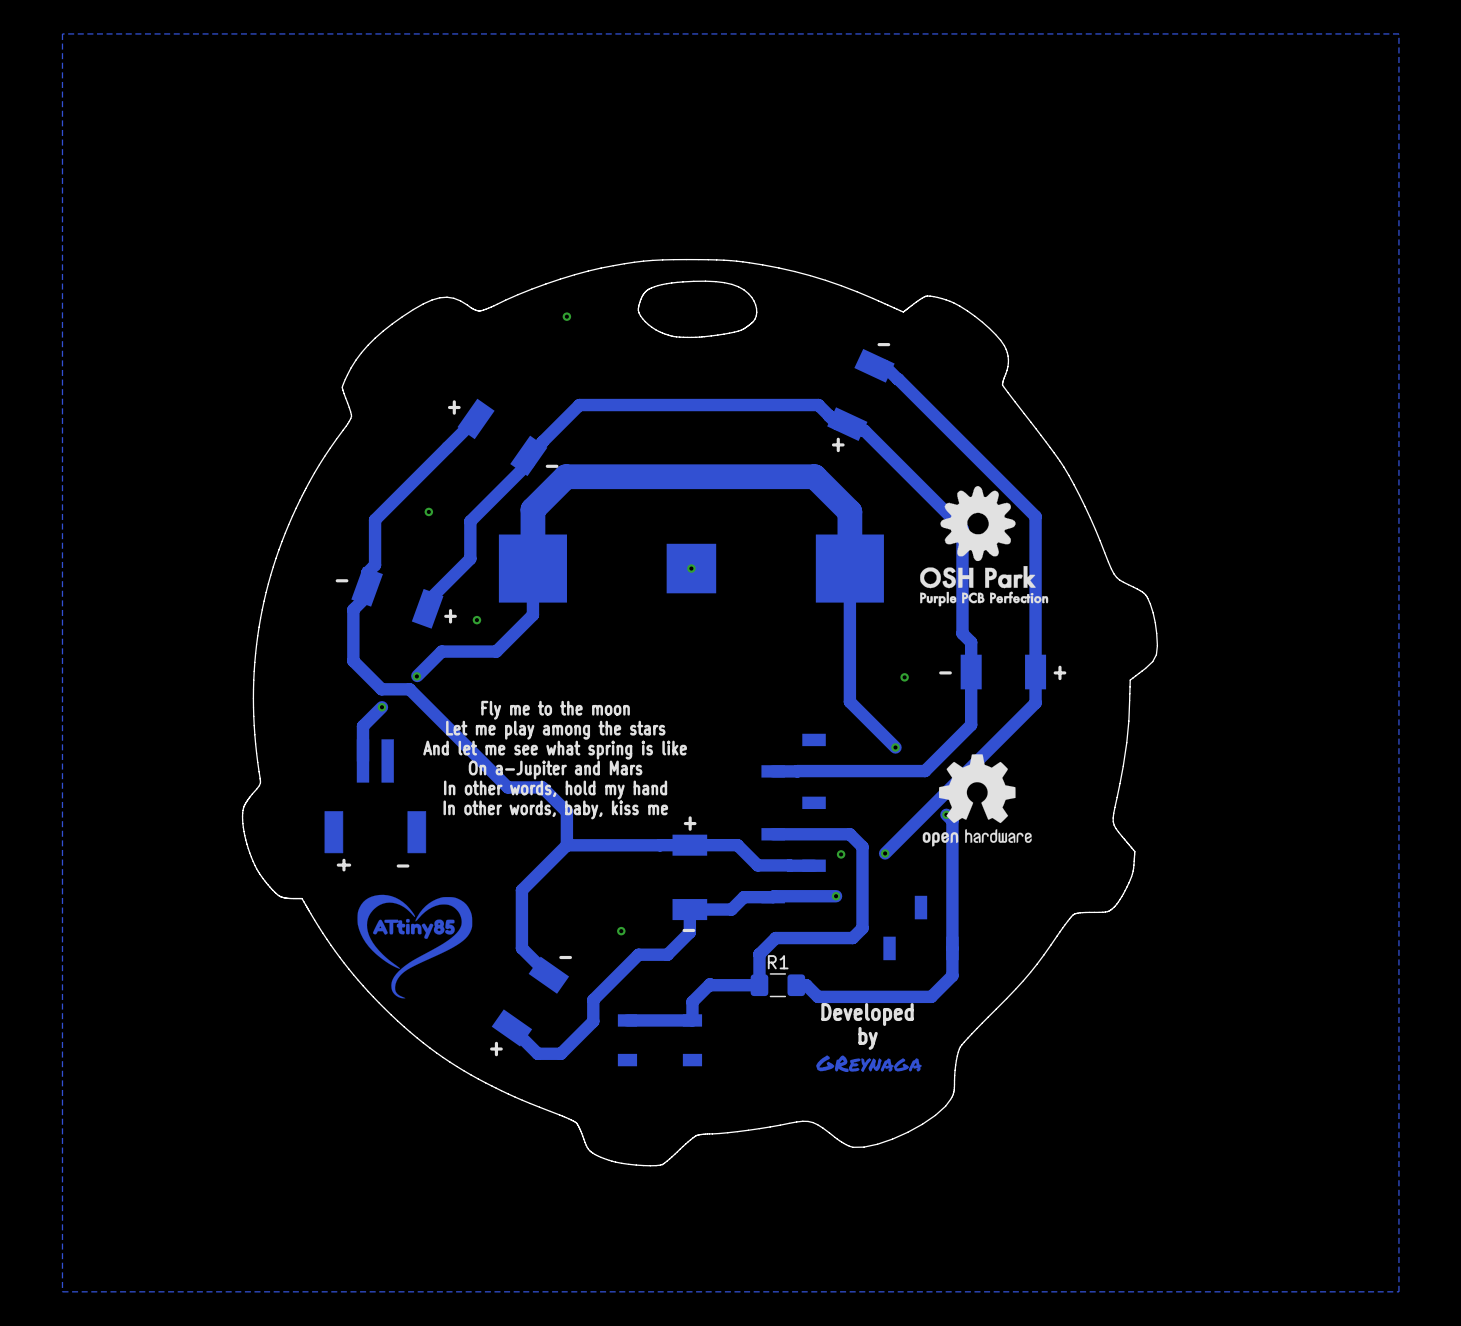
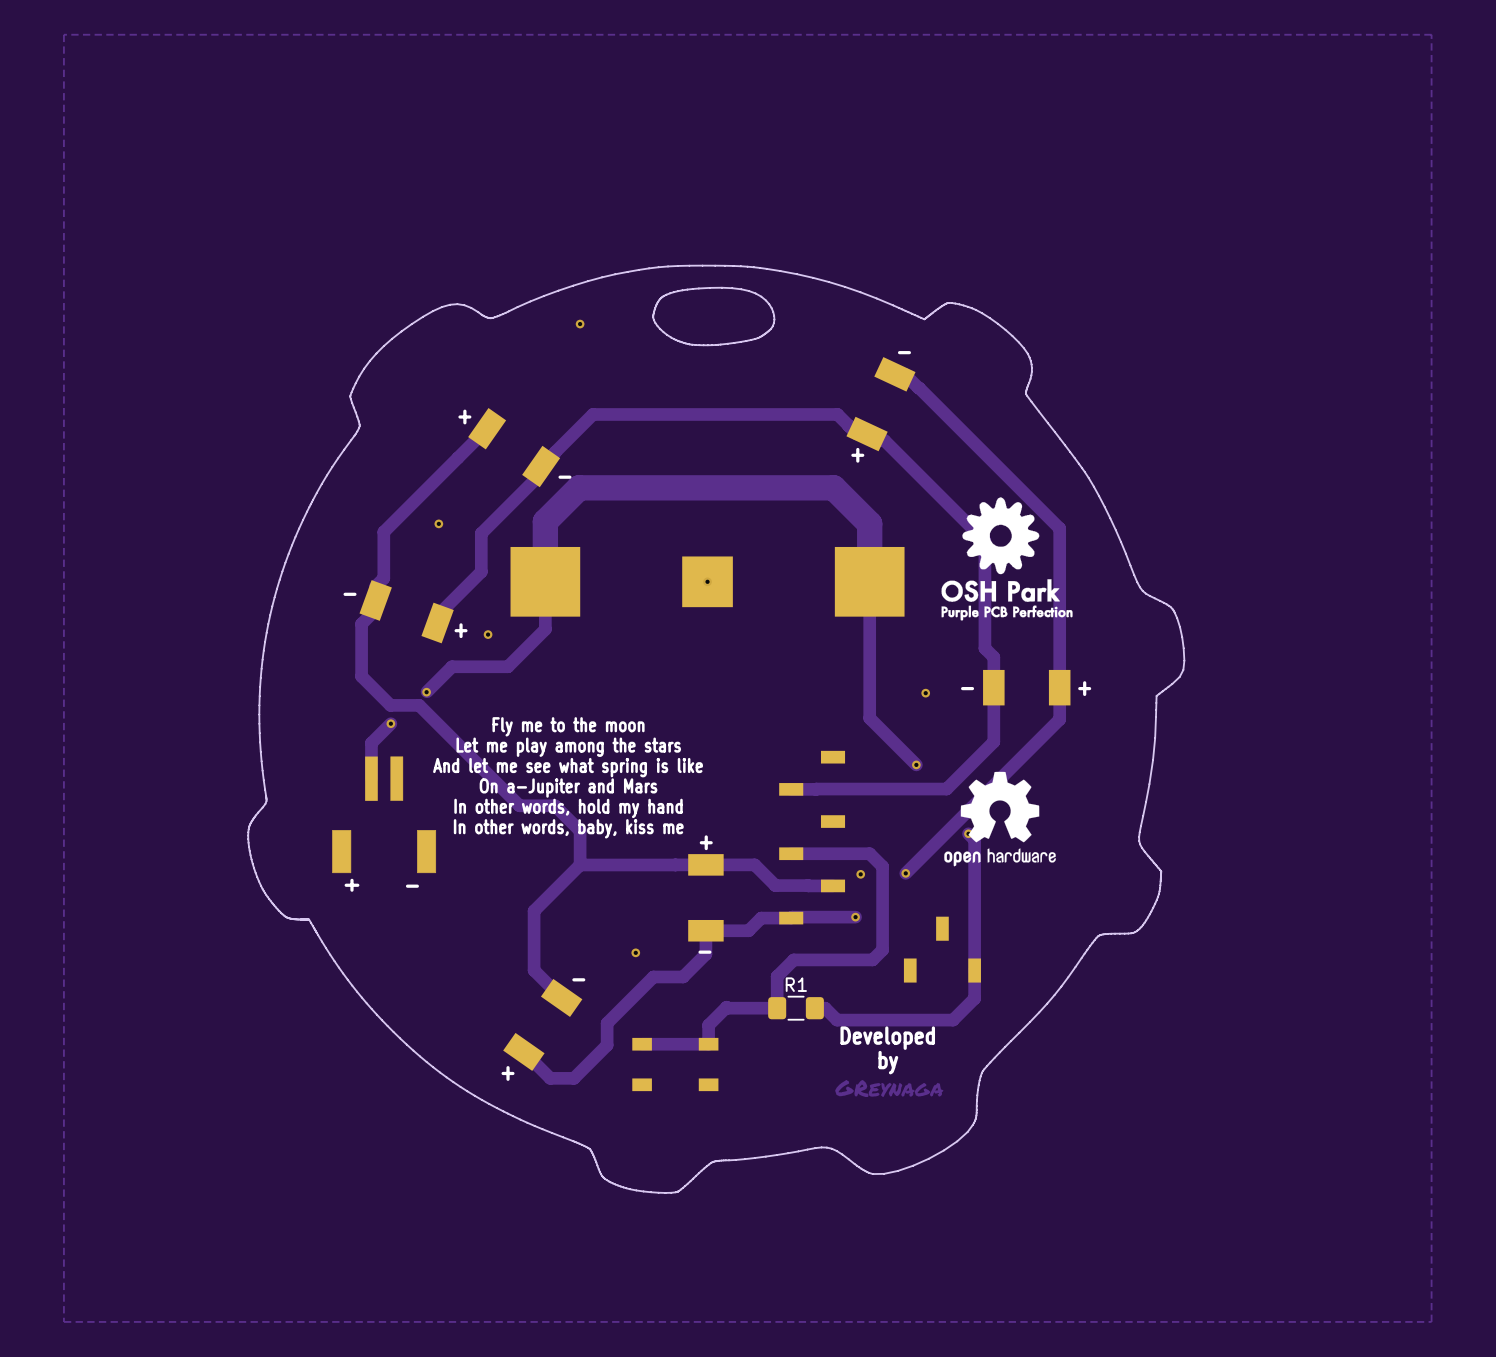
drawing: [357, 894, 473, 999] -> none

